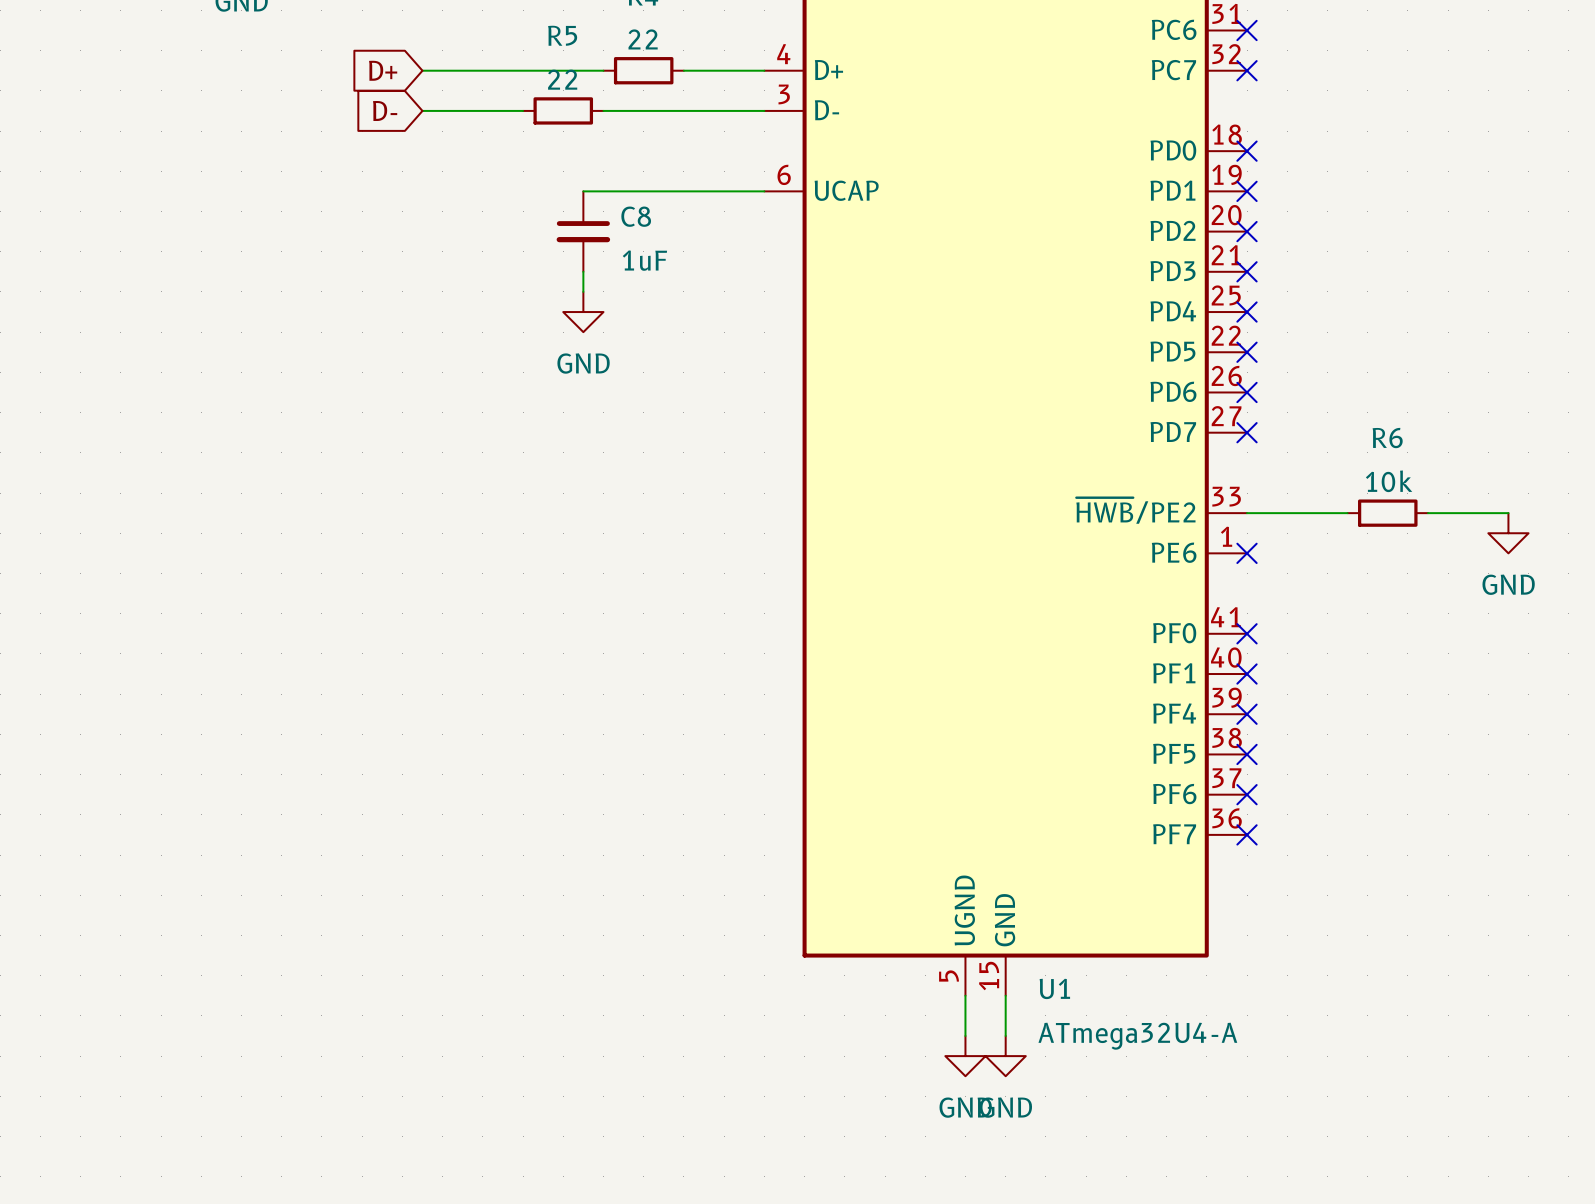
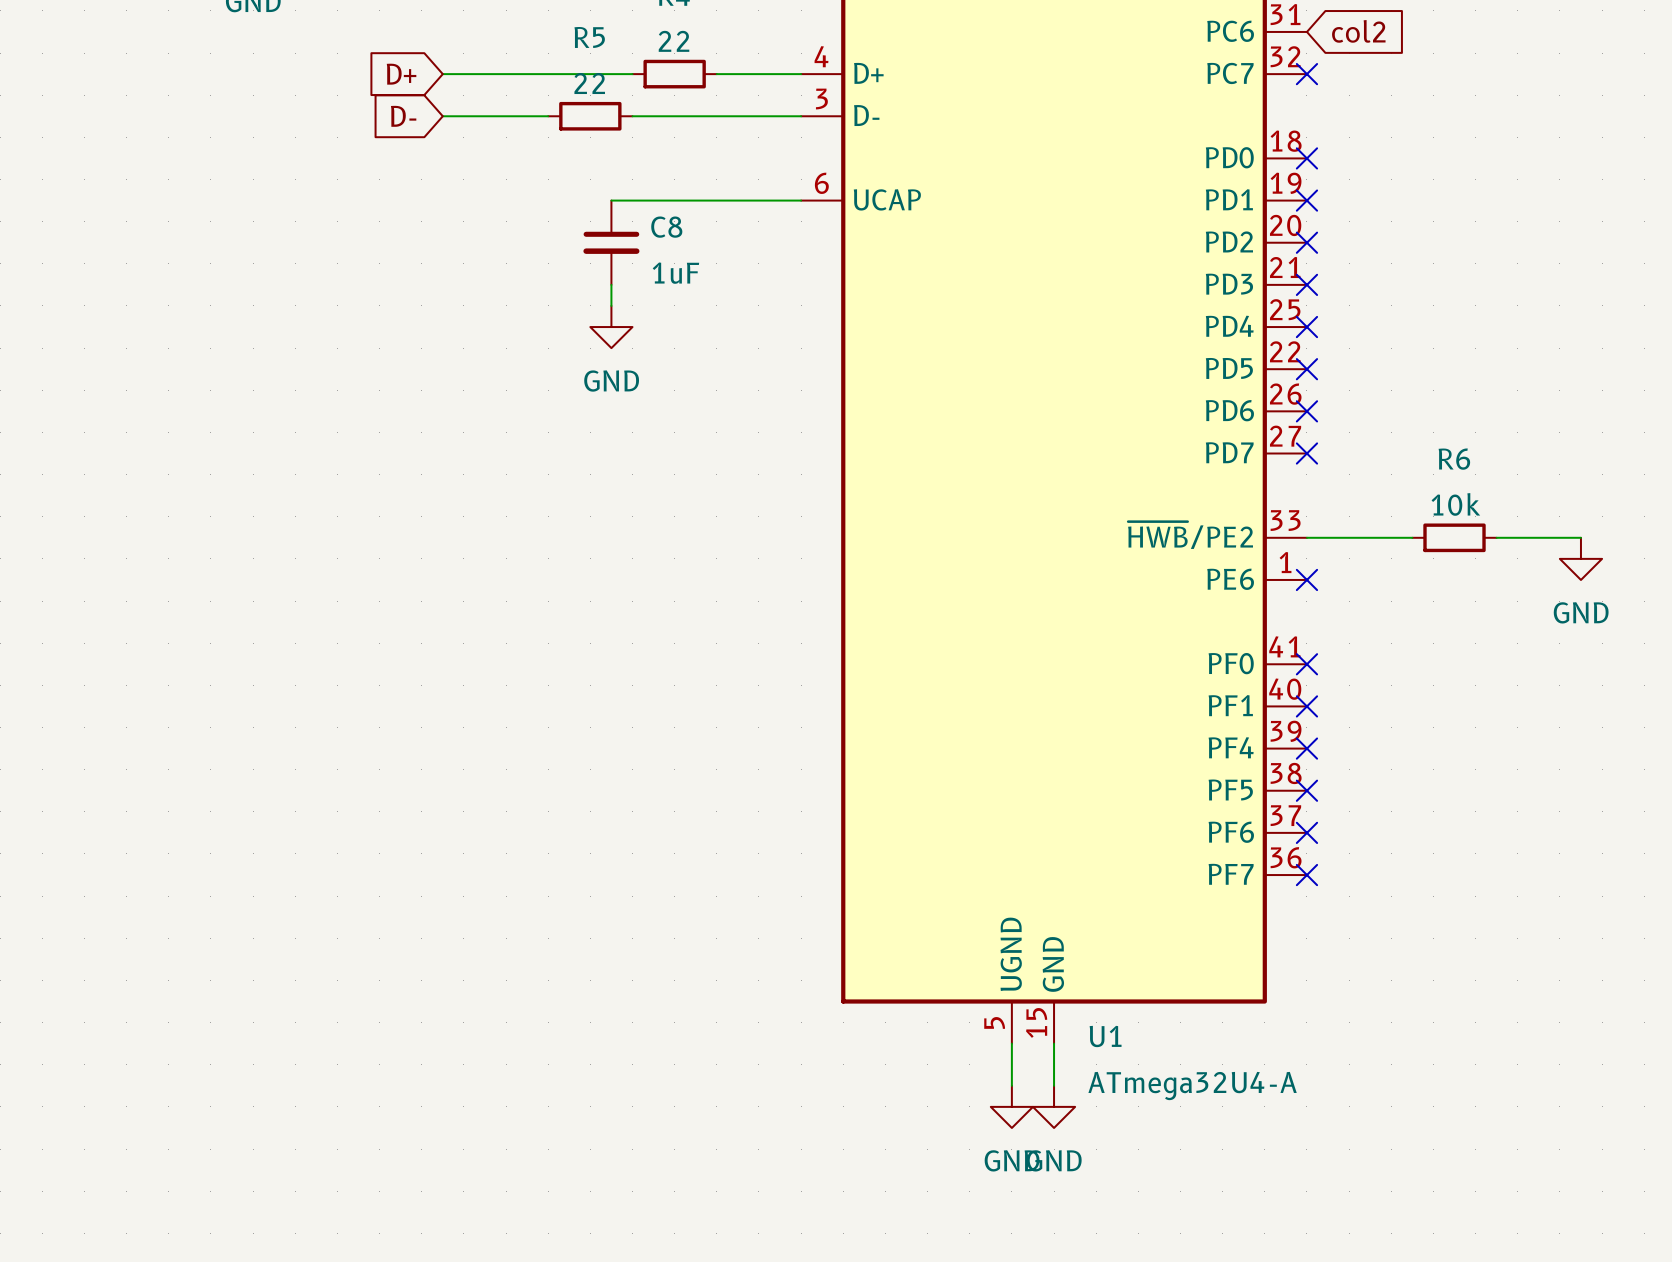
global label: none -> col2 (1358, 31)
no-connect mark: (1247, 30) -> none

